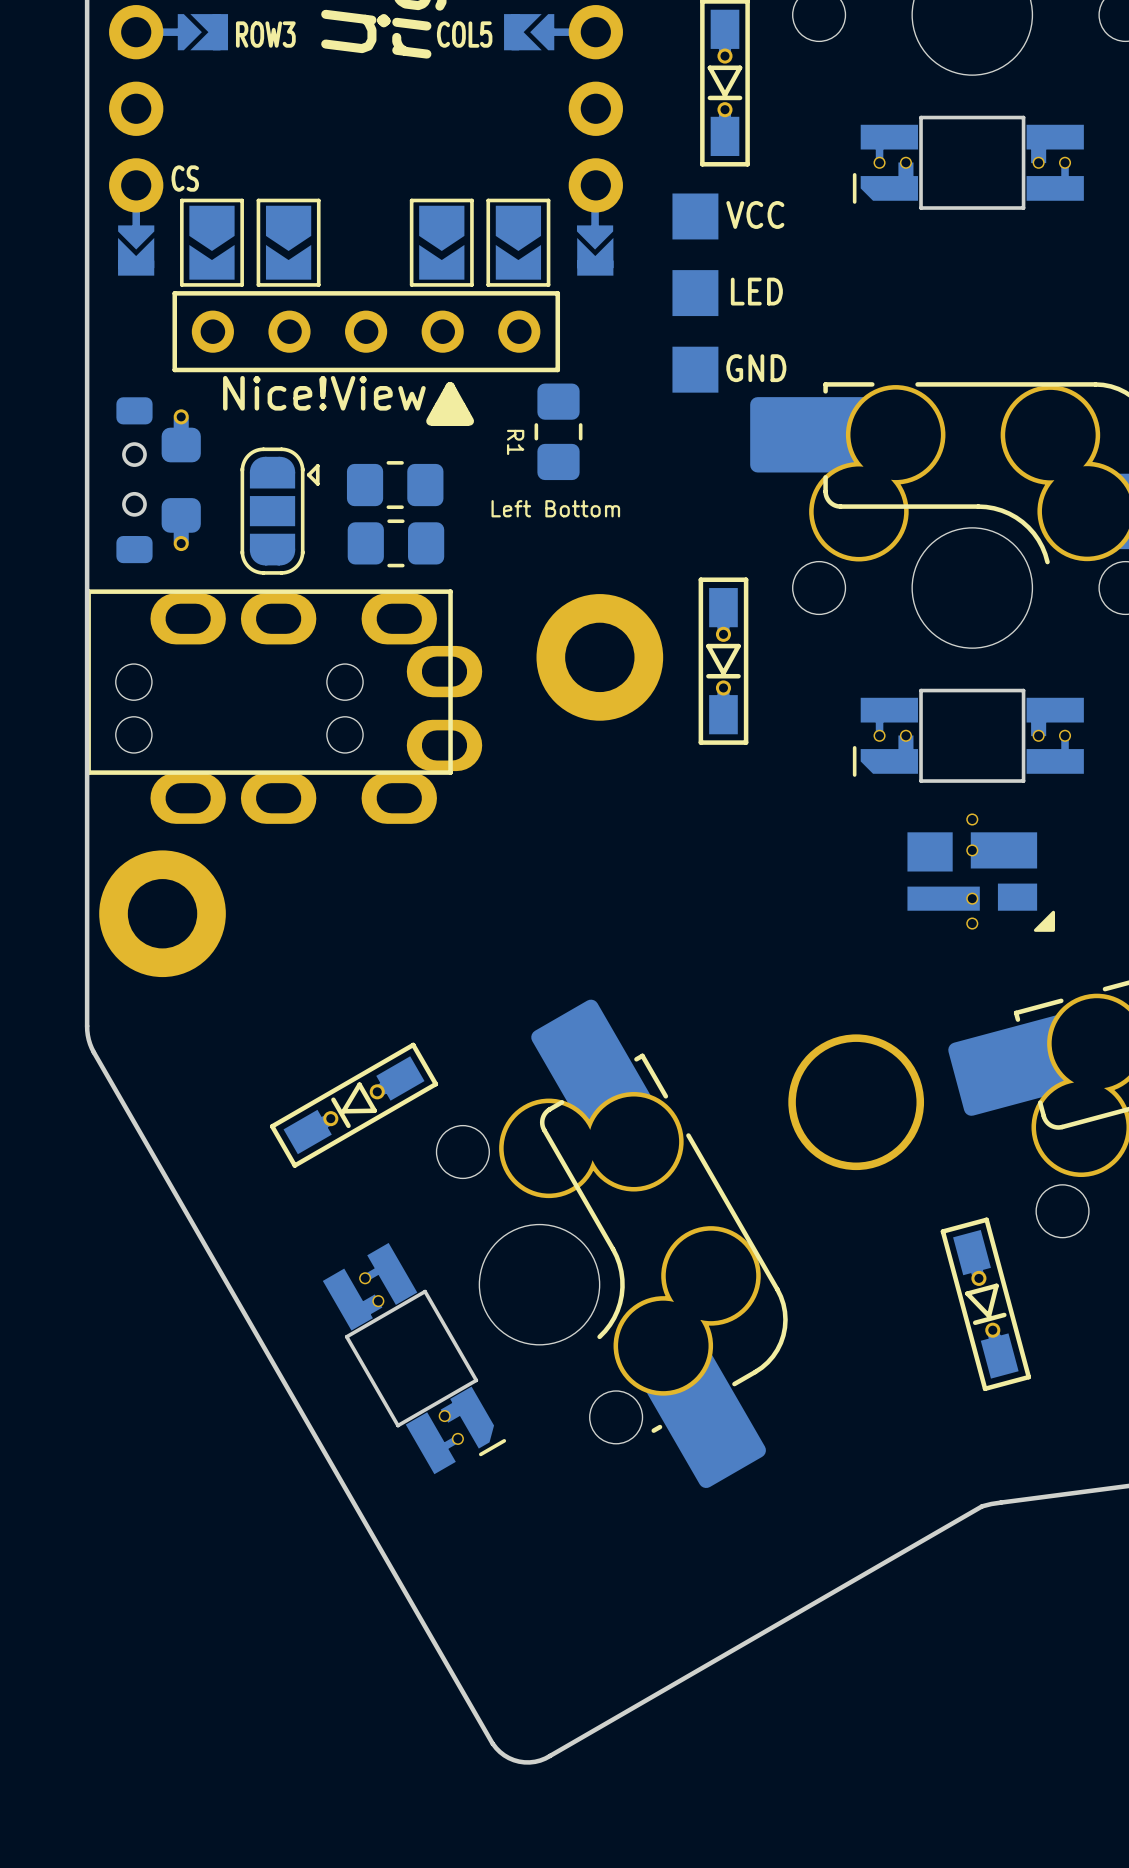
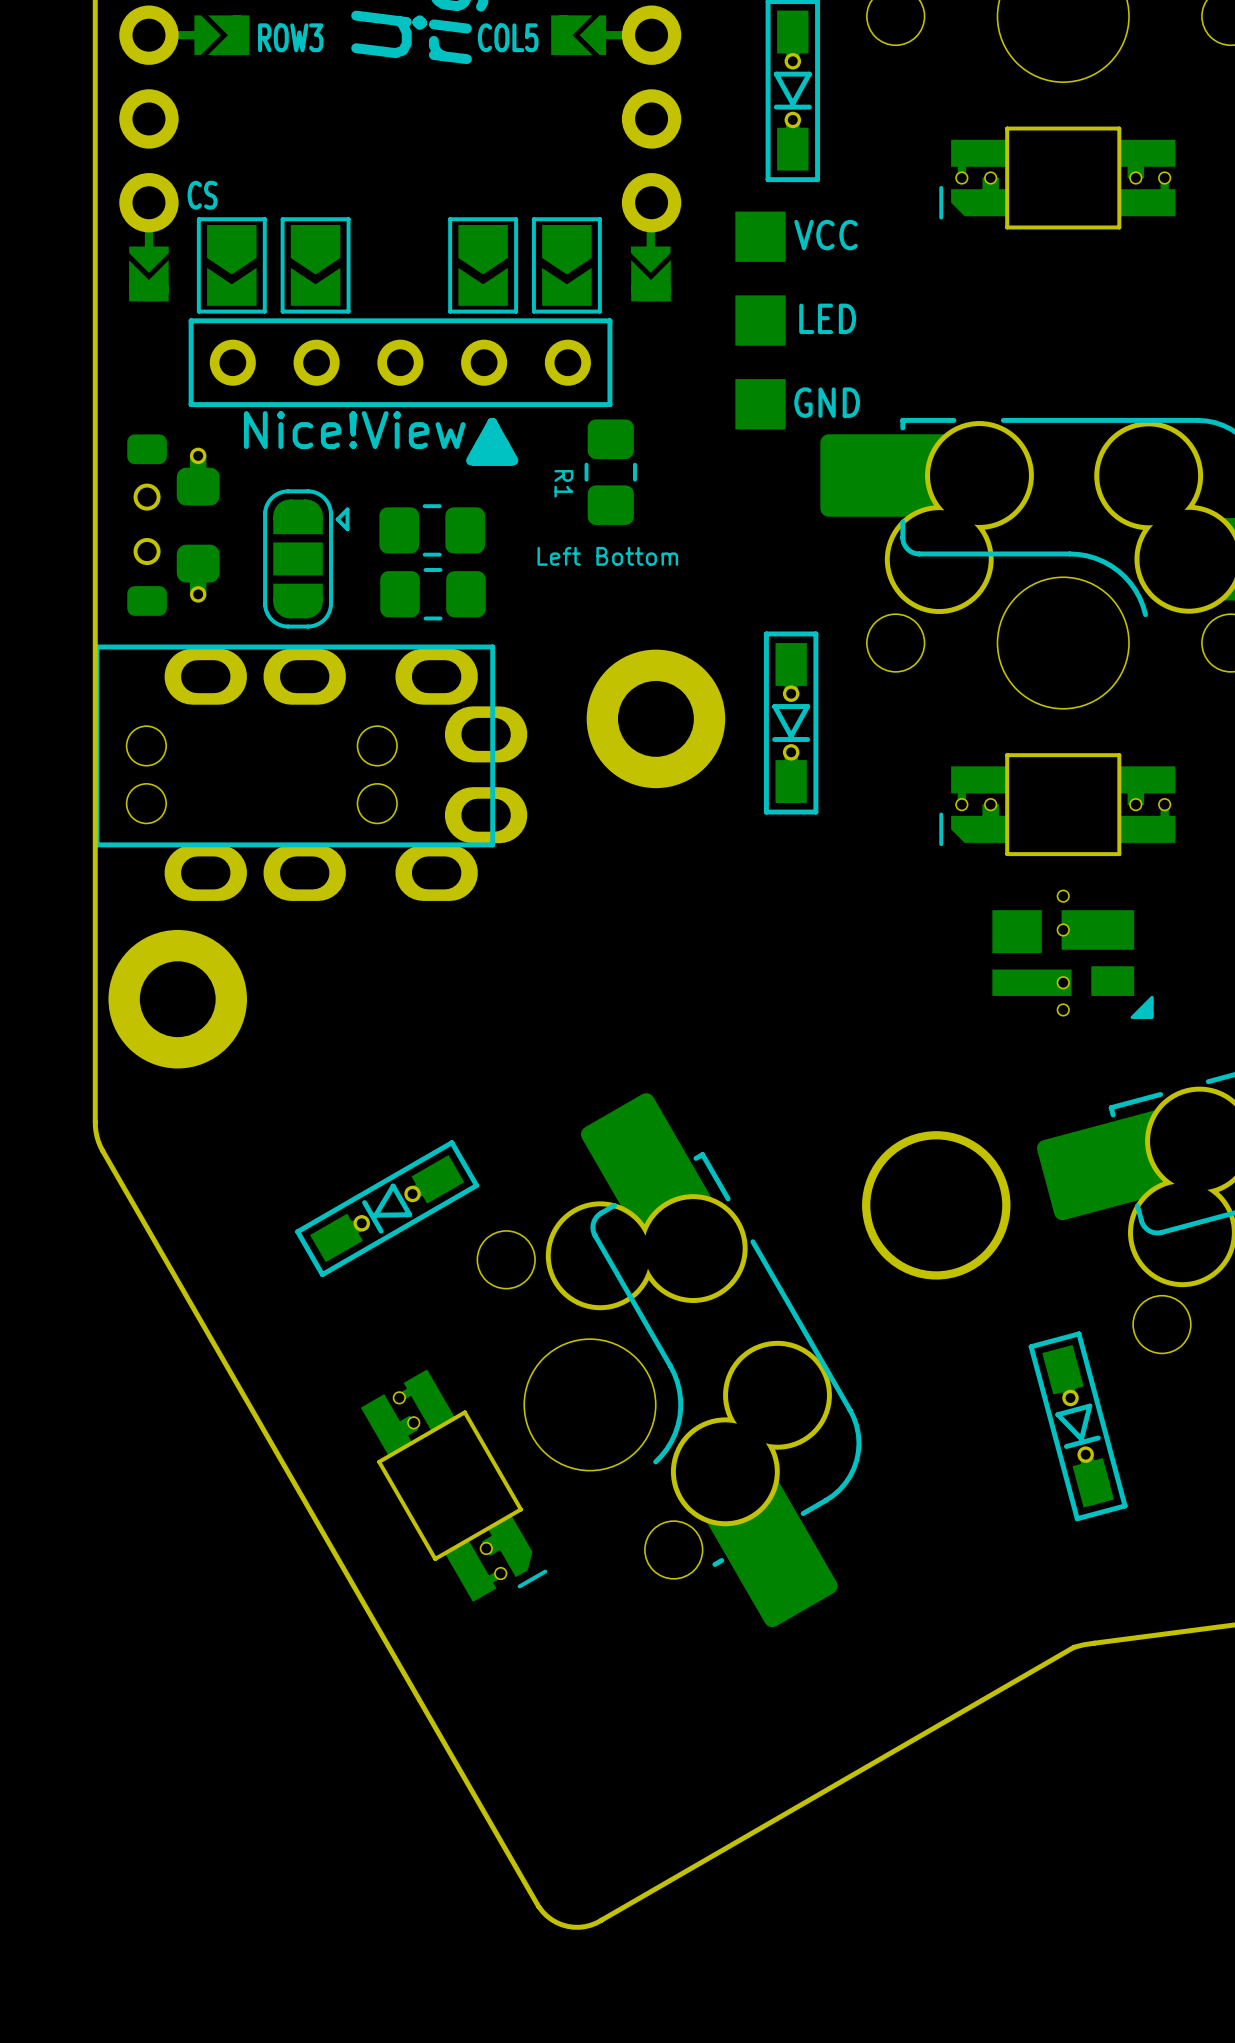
part footprint: [852, 115, 1084, 210] -> [939, 126, 1176, 230]
part footprint: [852, 688, 1084, 783] -> [939, 753, 1176, 857]
part footprint: [322, 1242, 507, 1475] -> [360, 1369, 548, 1602]

